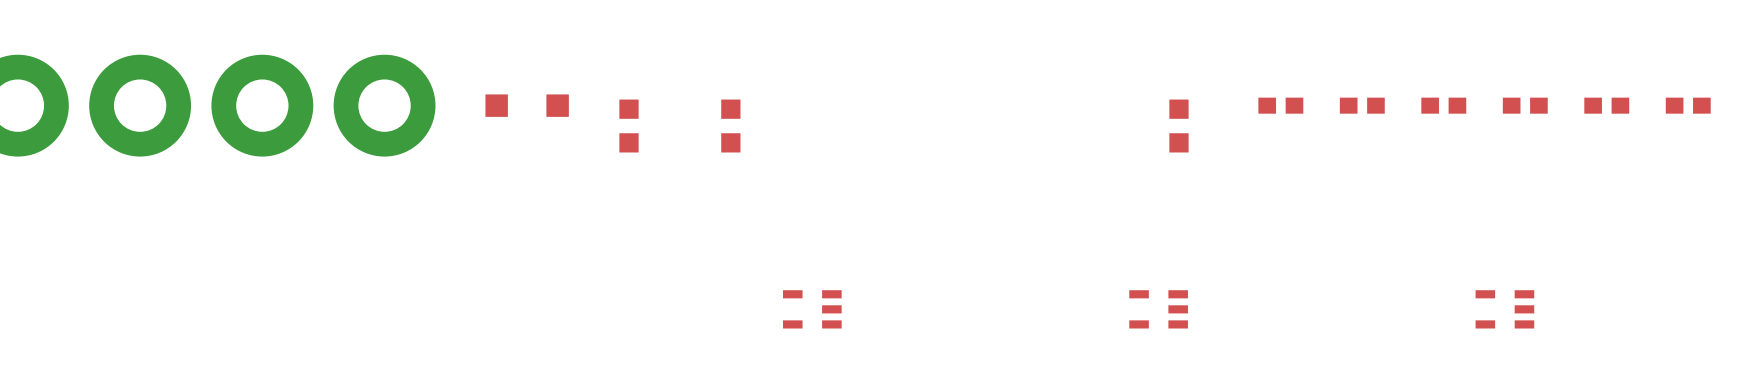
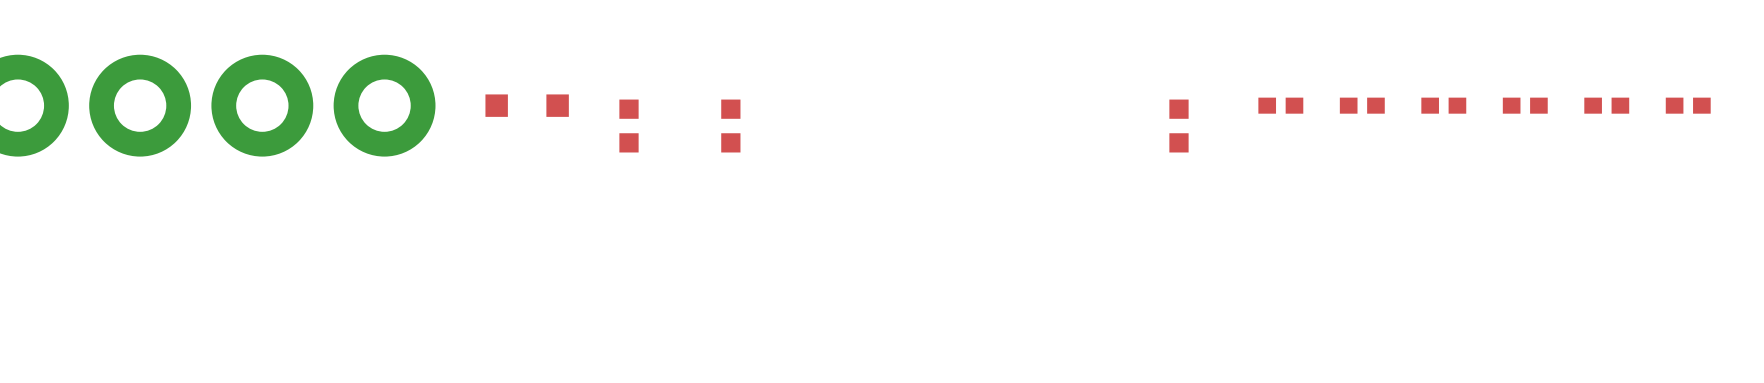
part: (812, 309) -> none
part: (1158, 309) -> none
part: (1504, 309) -> none

